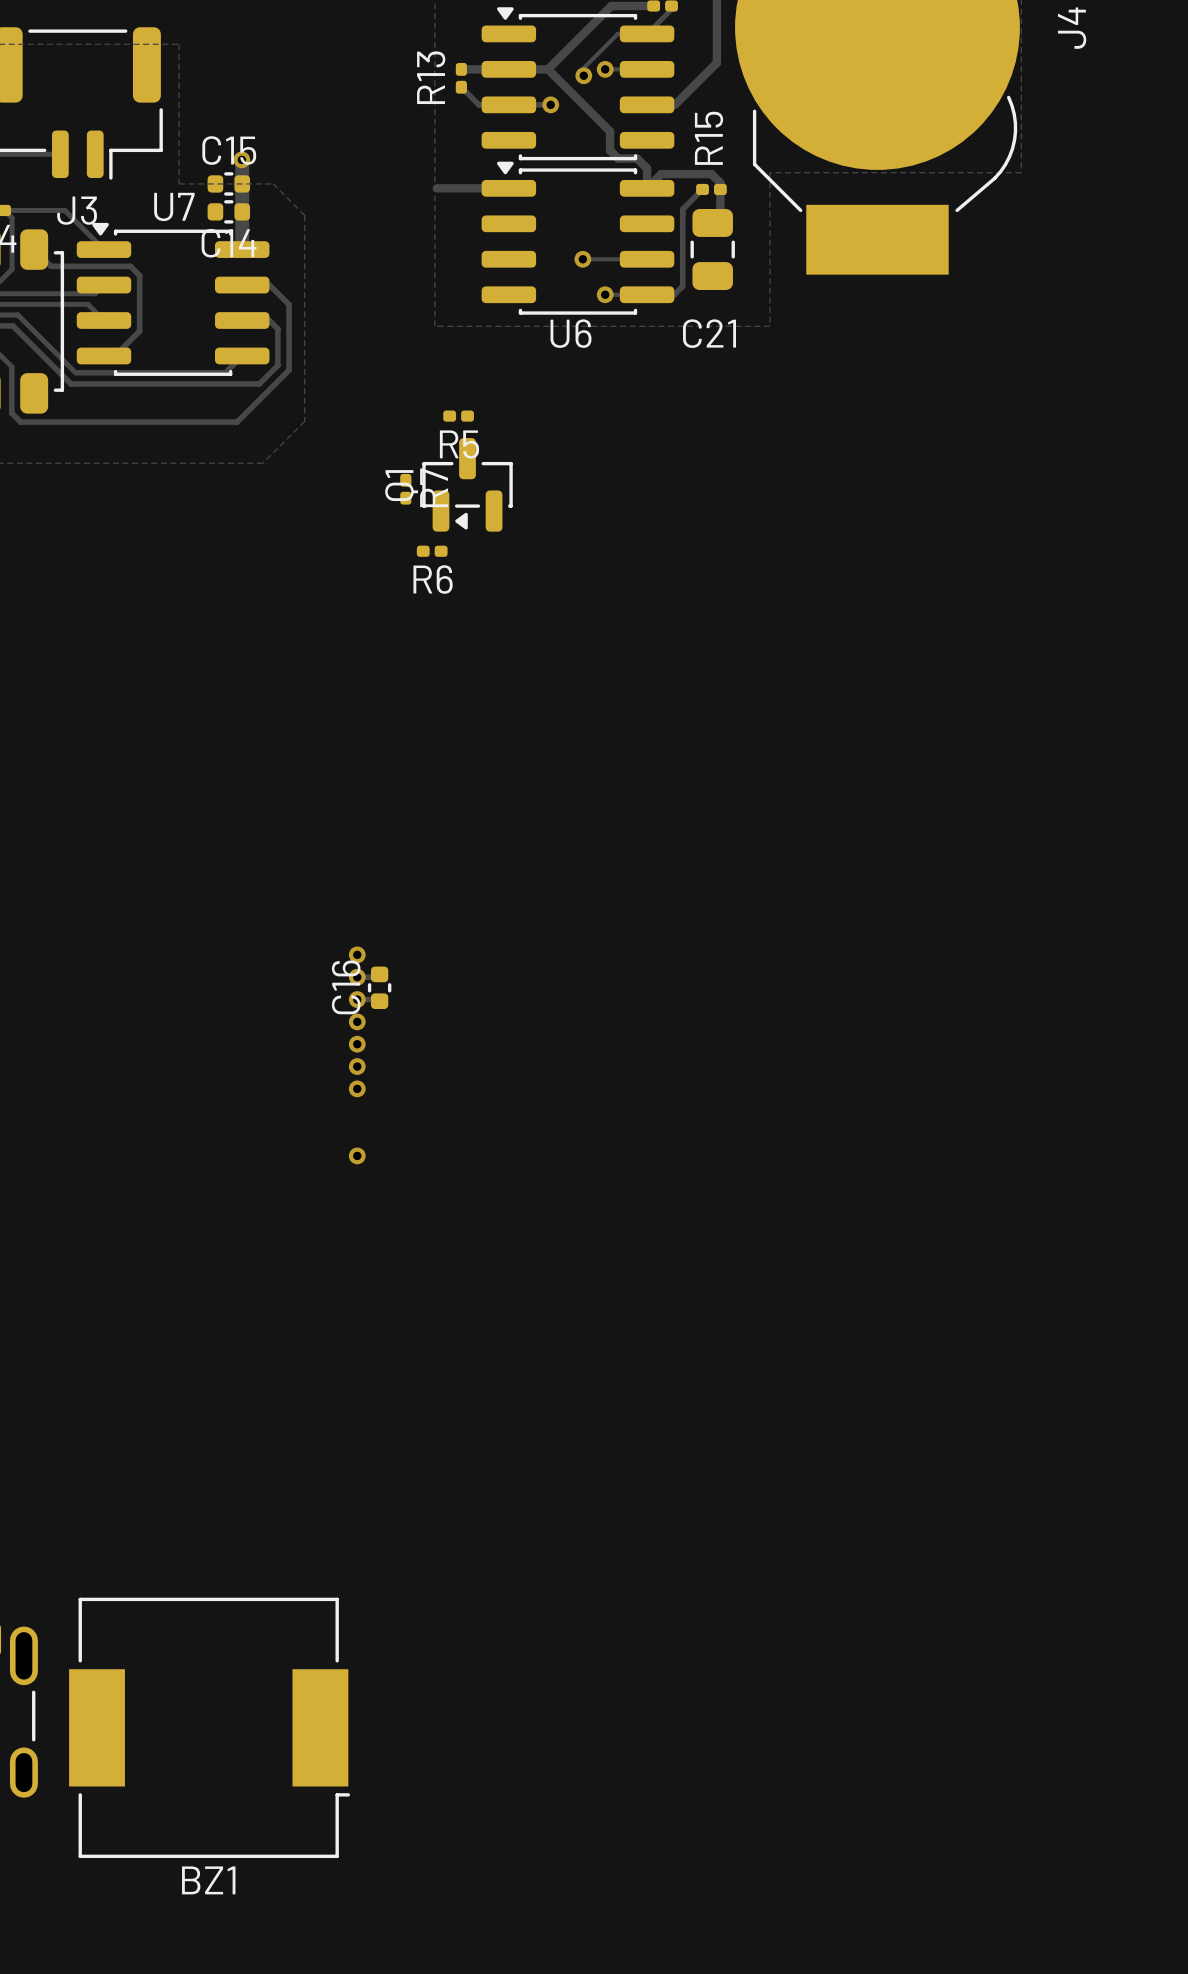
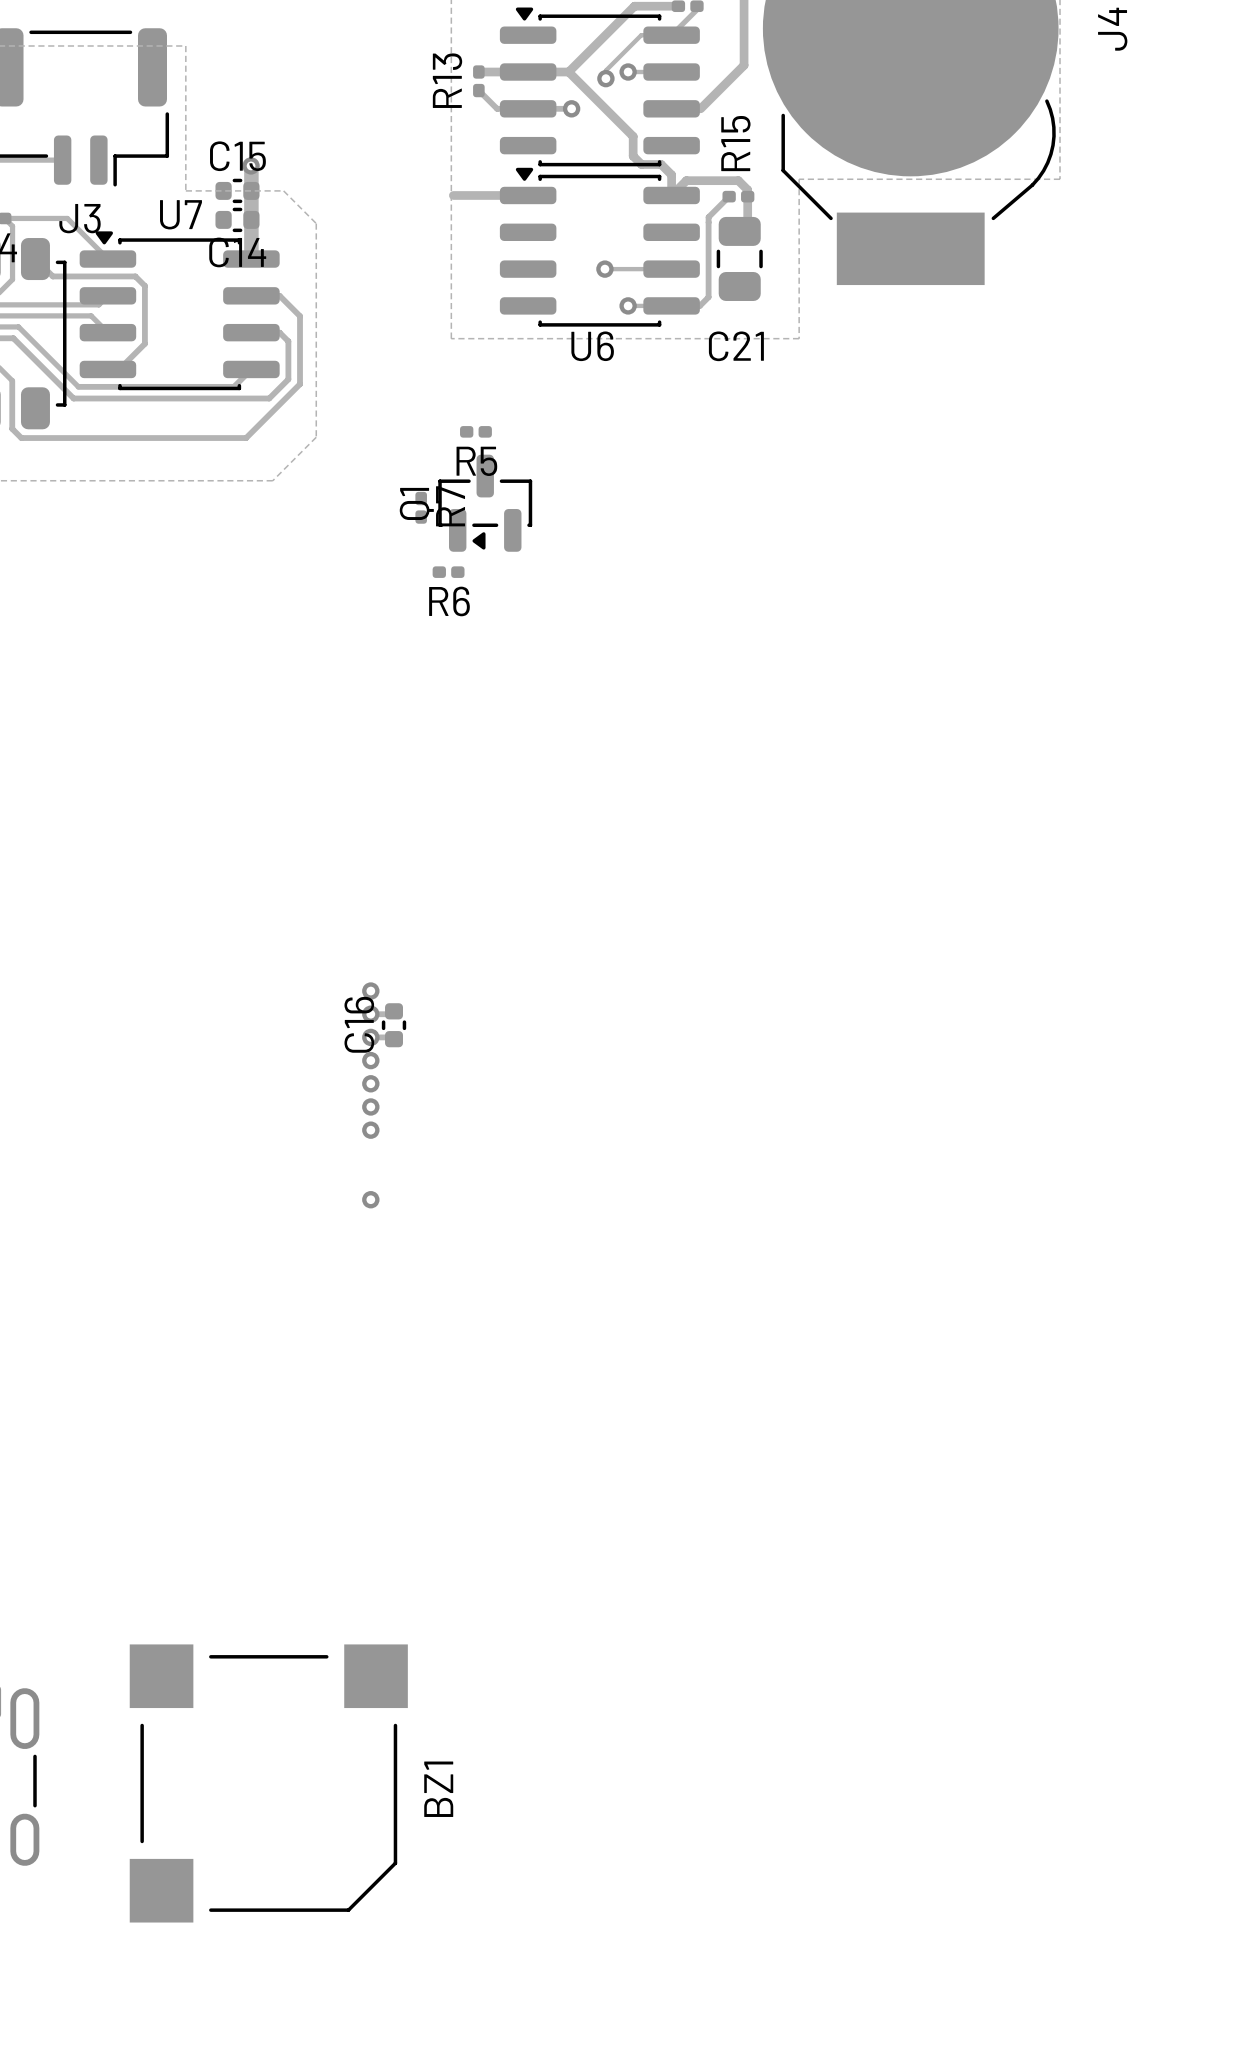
BZ1 footprint: [69, 1597, 351, 1858] -> [129, 1644, 408, 1923]
BZ1 name position: BZ1 (208, 1880) -> BZ1 (438, 1789)

